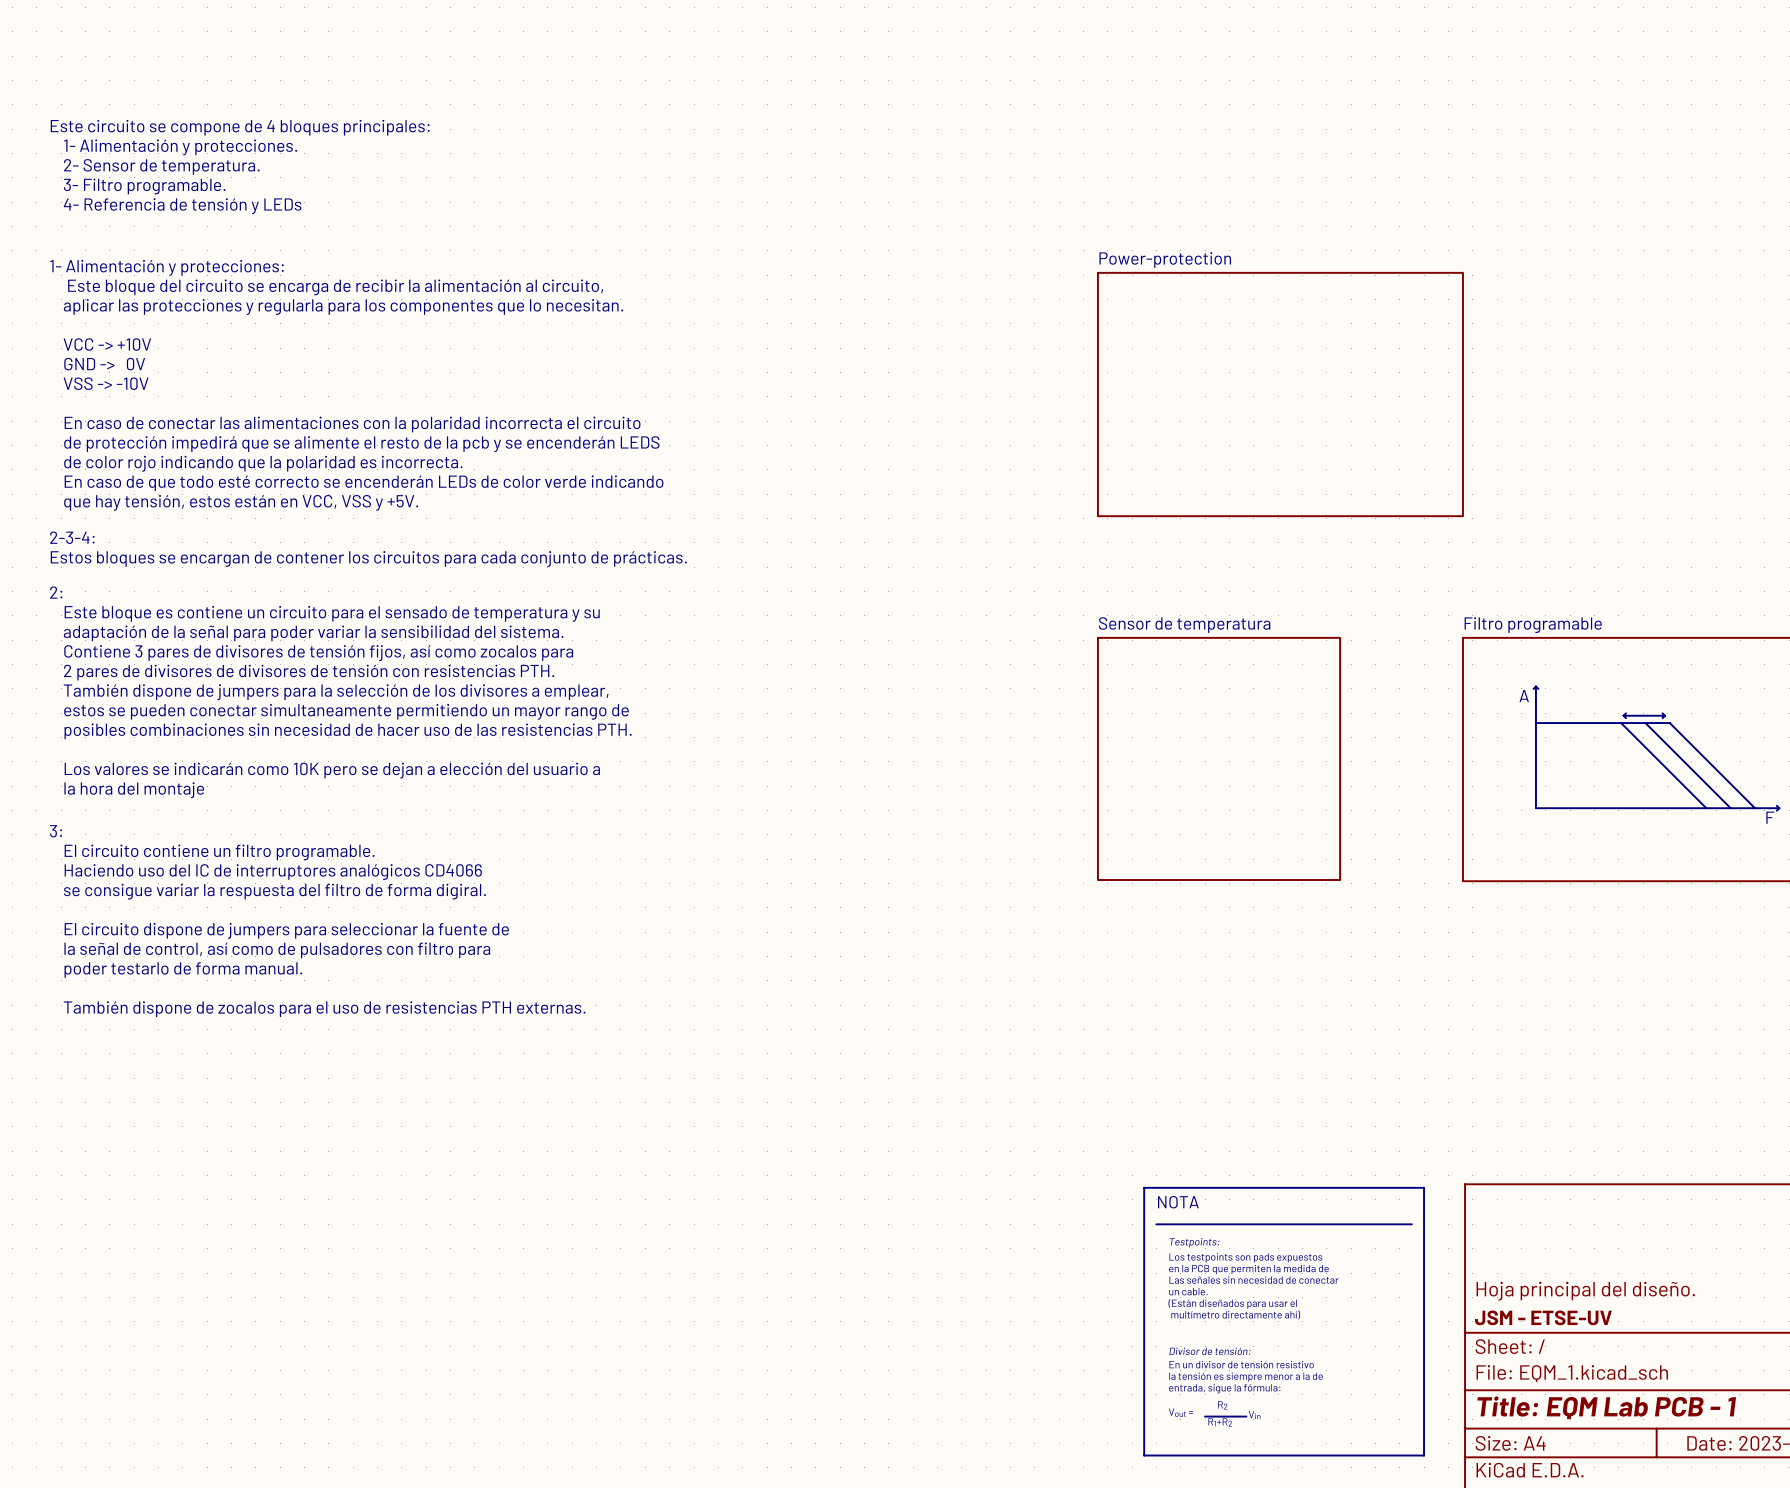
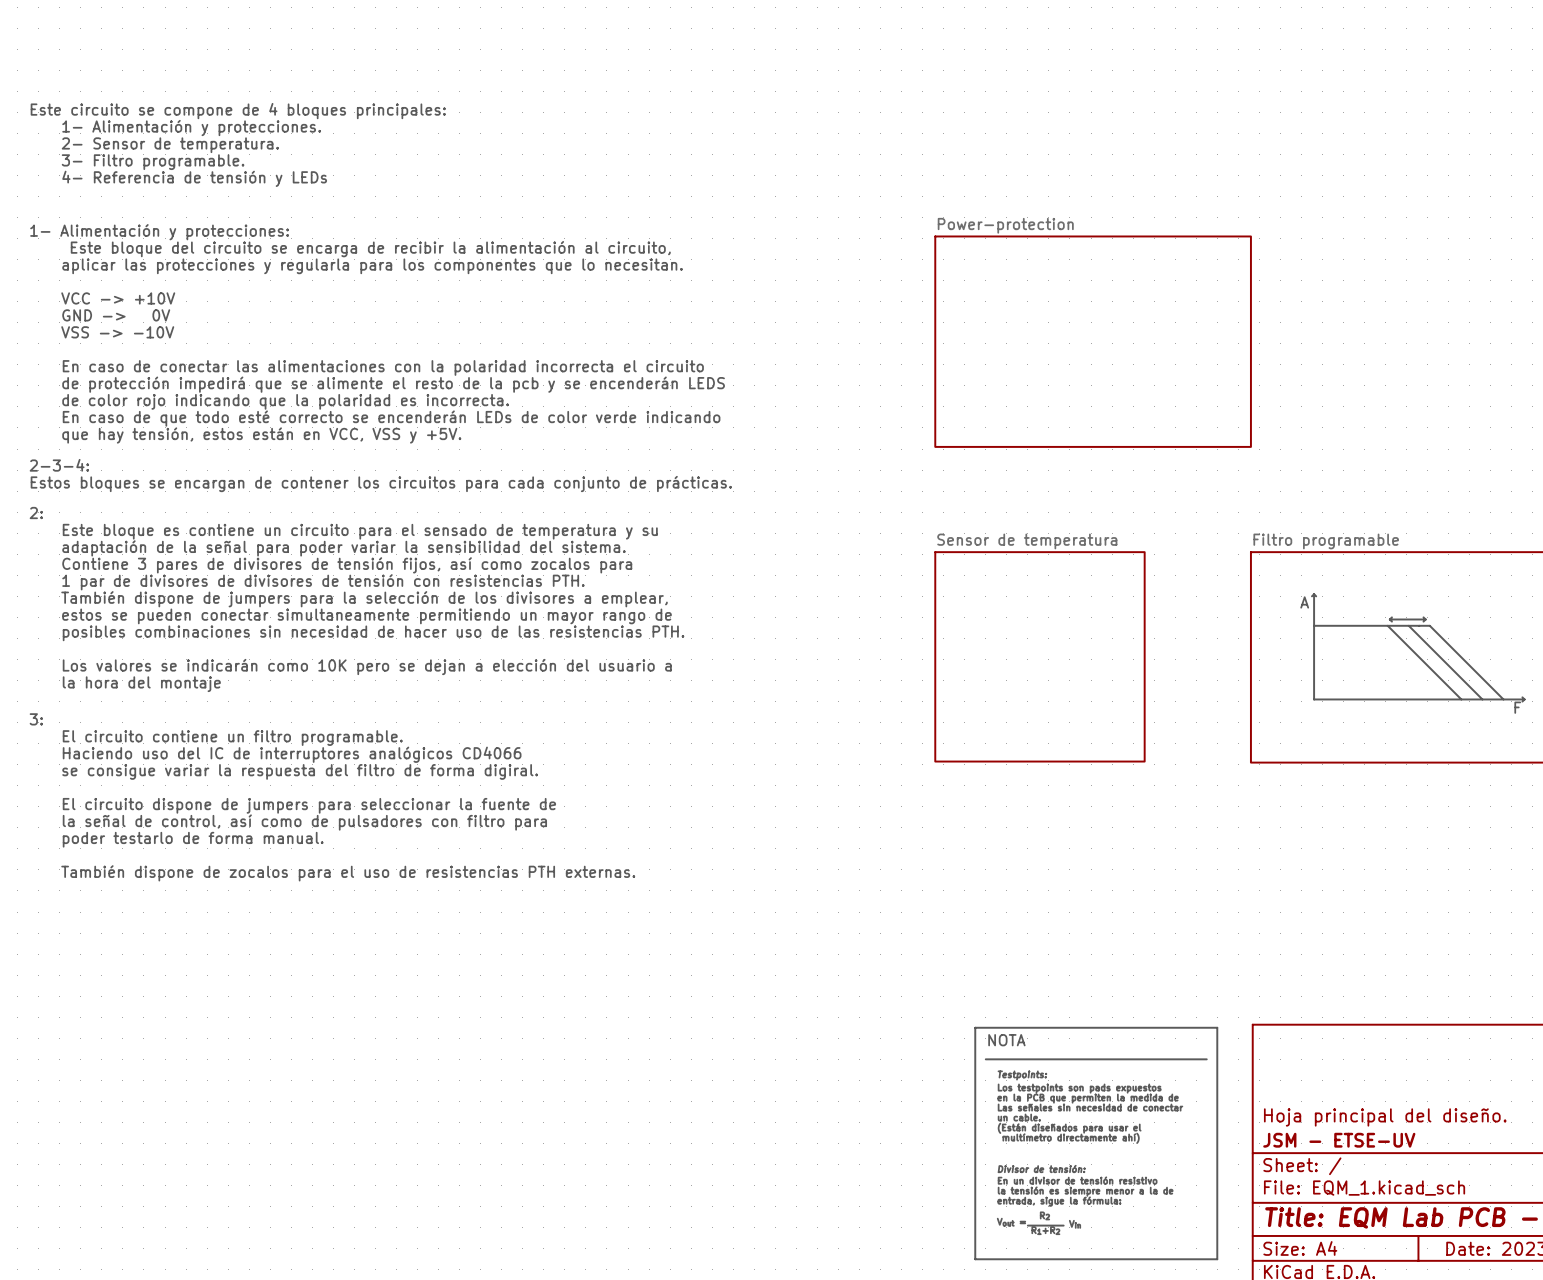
text: 2 pares de divisores de divisores de tensión con resistencias PTH. (309, 672) -> 1 par de divisores de divisores de tensión con resistencias PTH. (323, 582)

